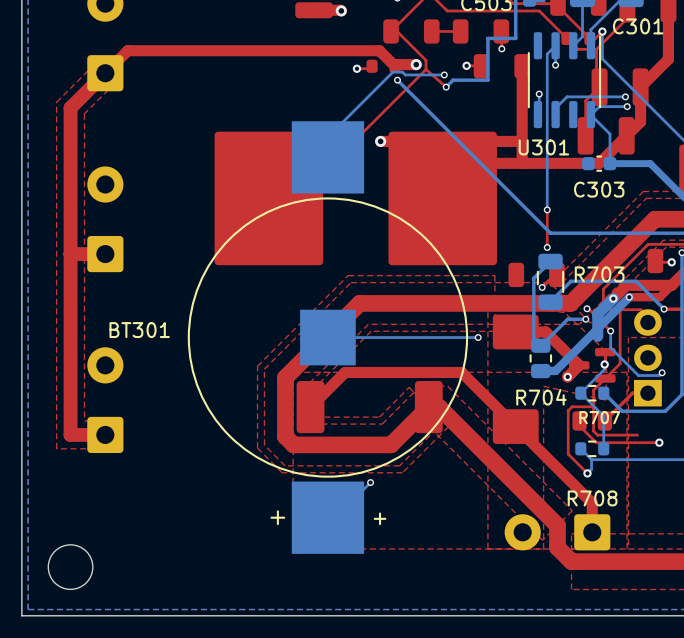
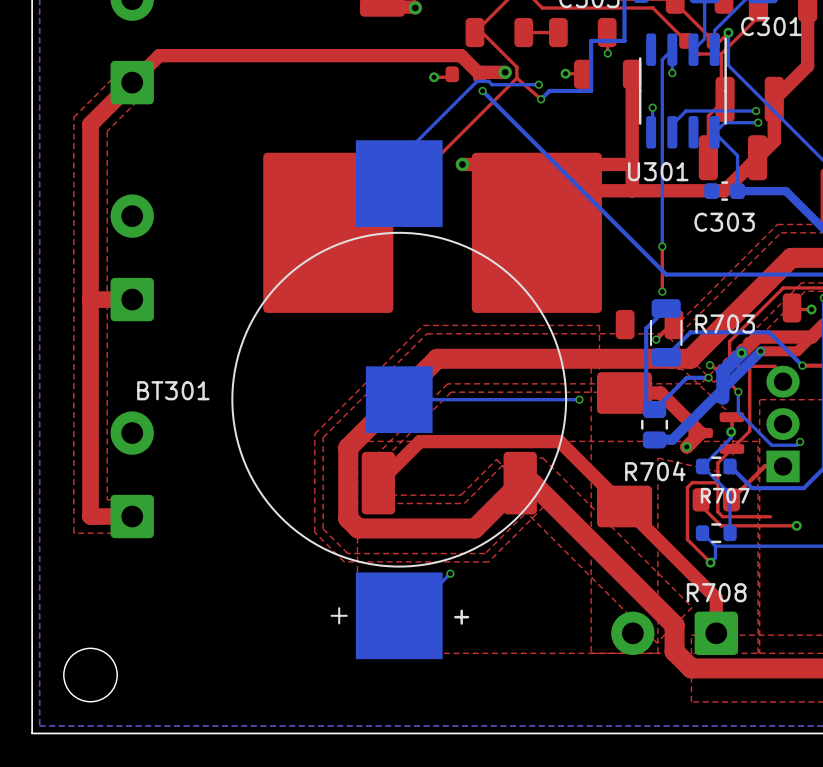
part footprint: [187, 121, 469, 554] -> [231, 140, 568, 660]
part footprint: [536, 253, 565, 311] -> [650, 299, 683, 367]

